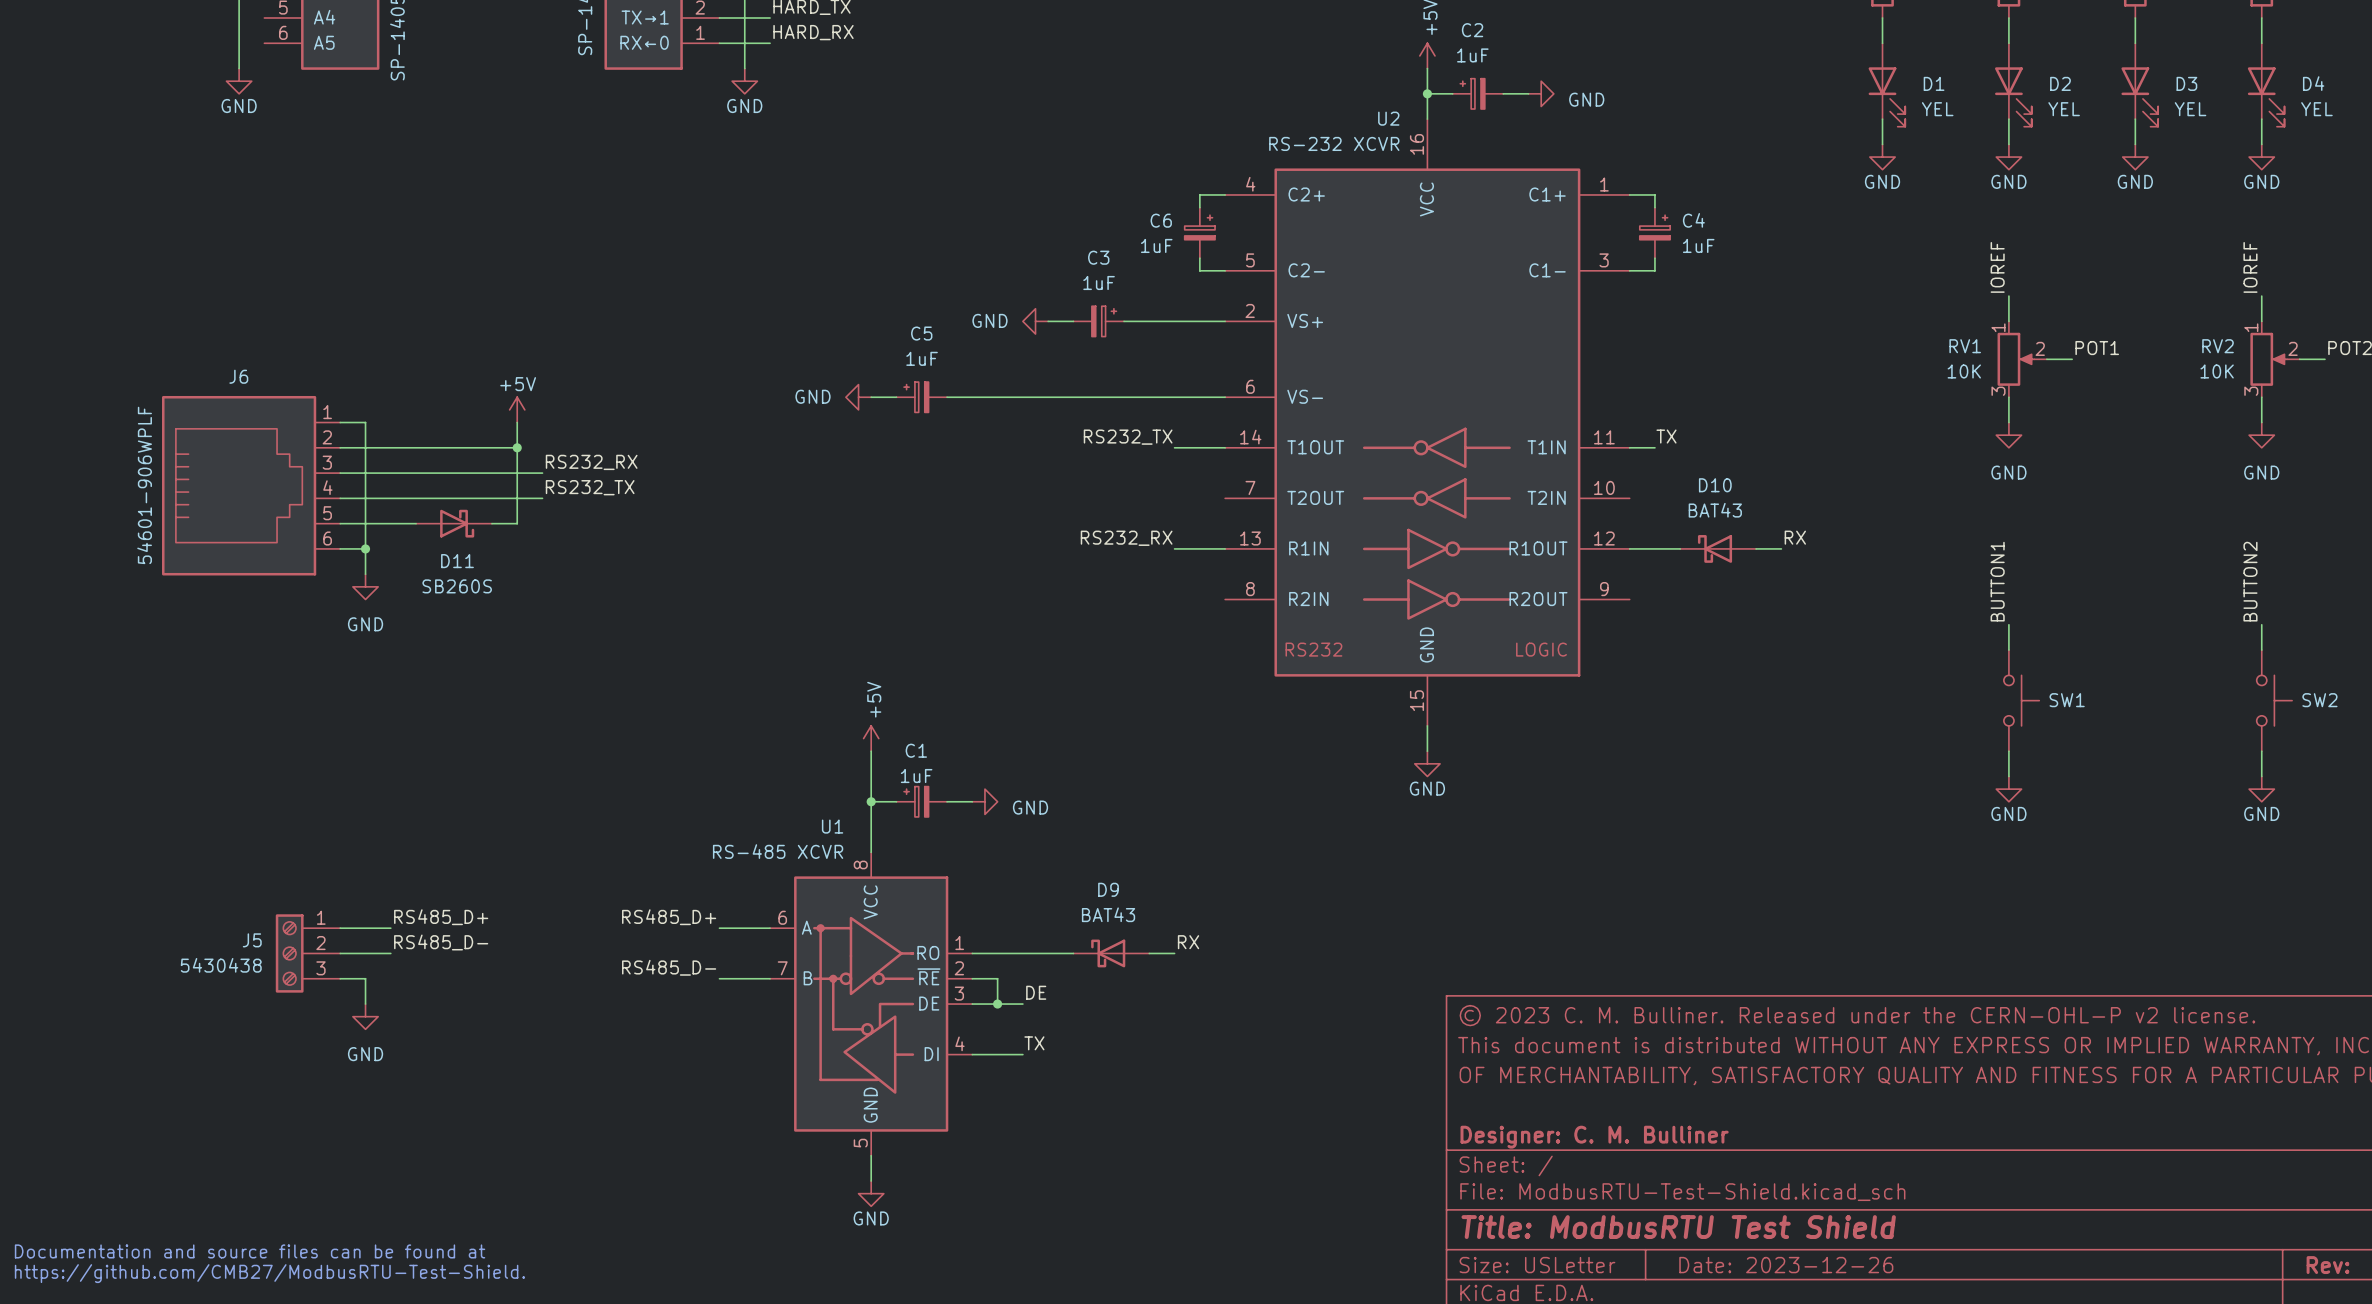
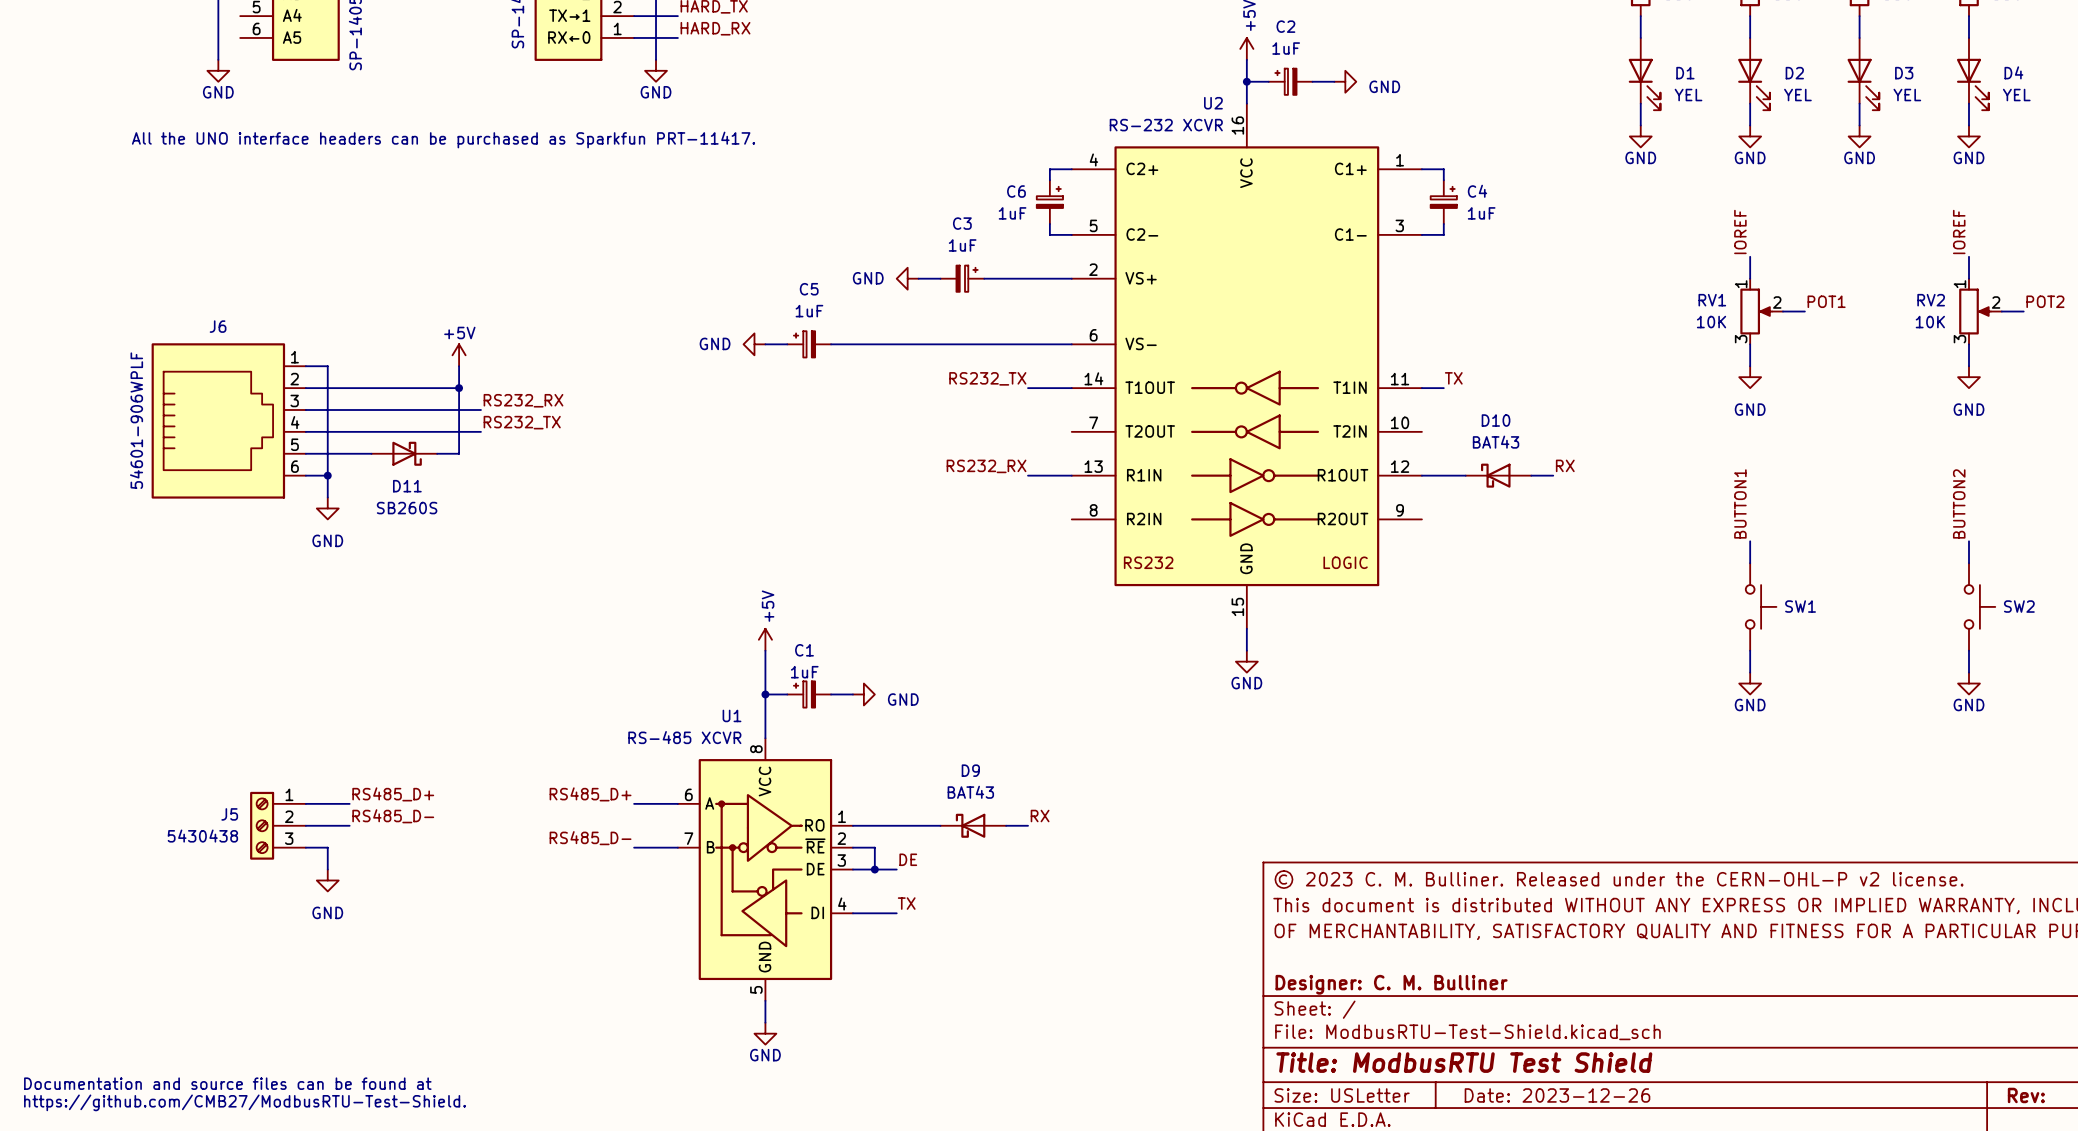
text: none -> All the UNO interface headers can be purchased as Sparkfun PRT-11417. (443, 140)

